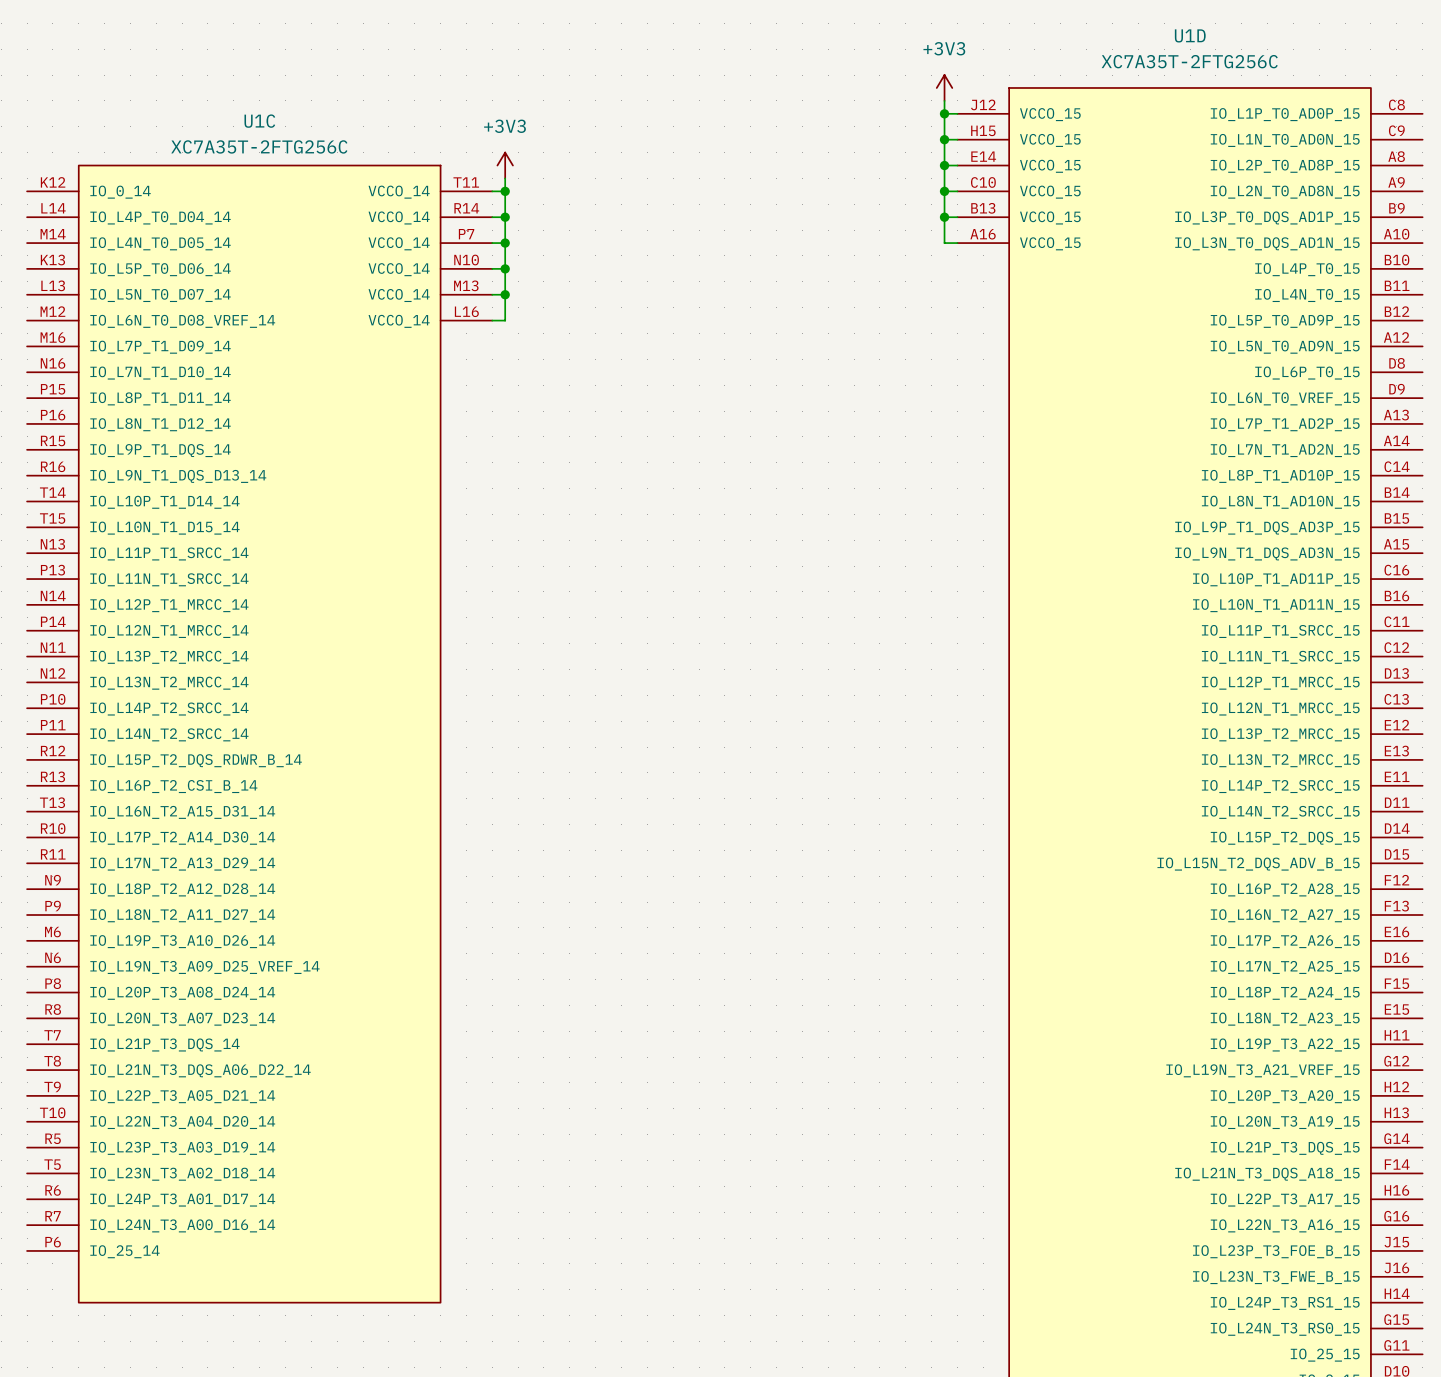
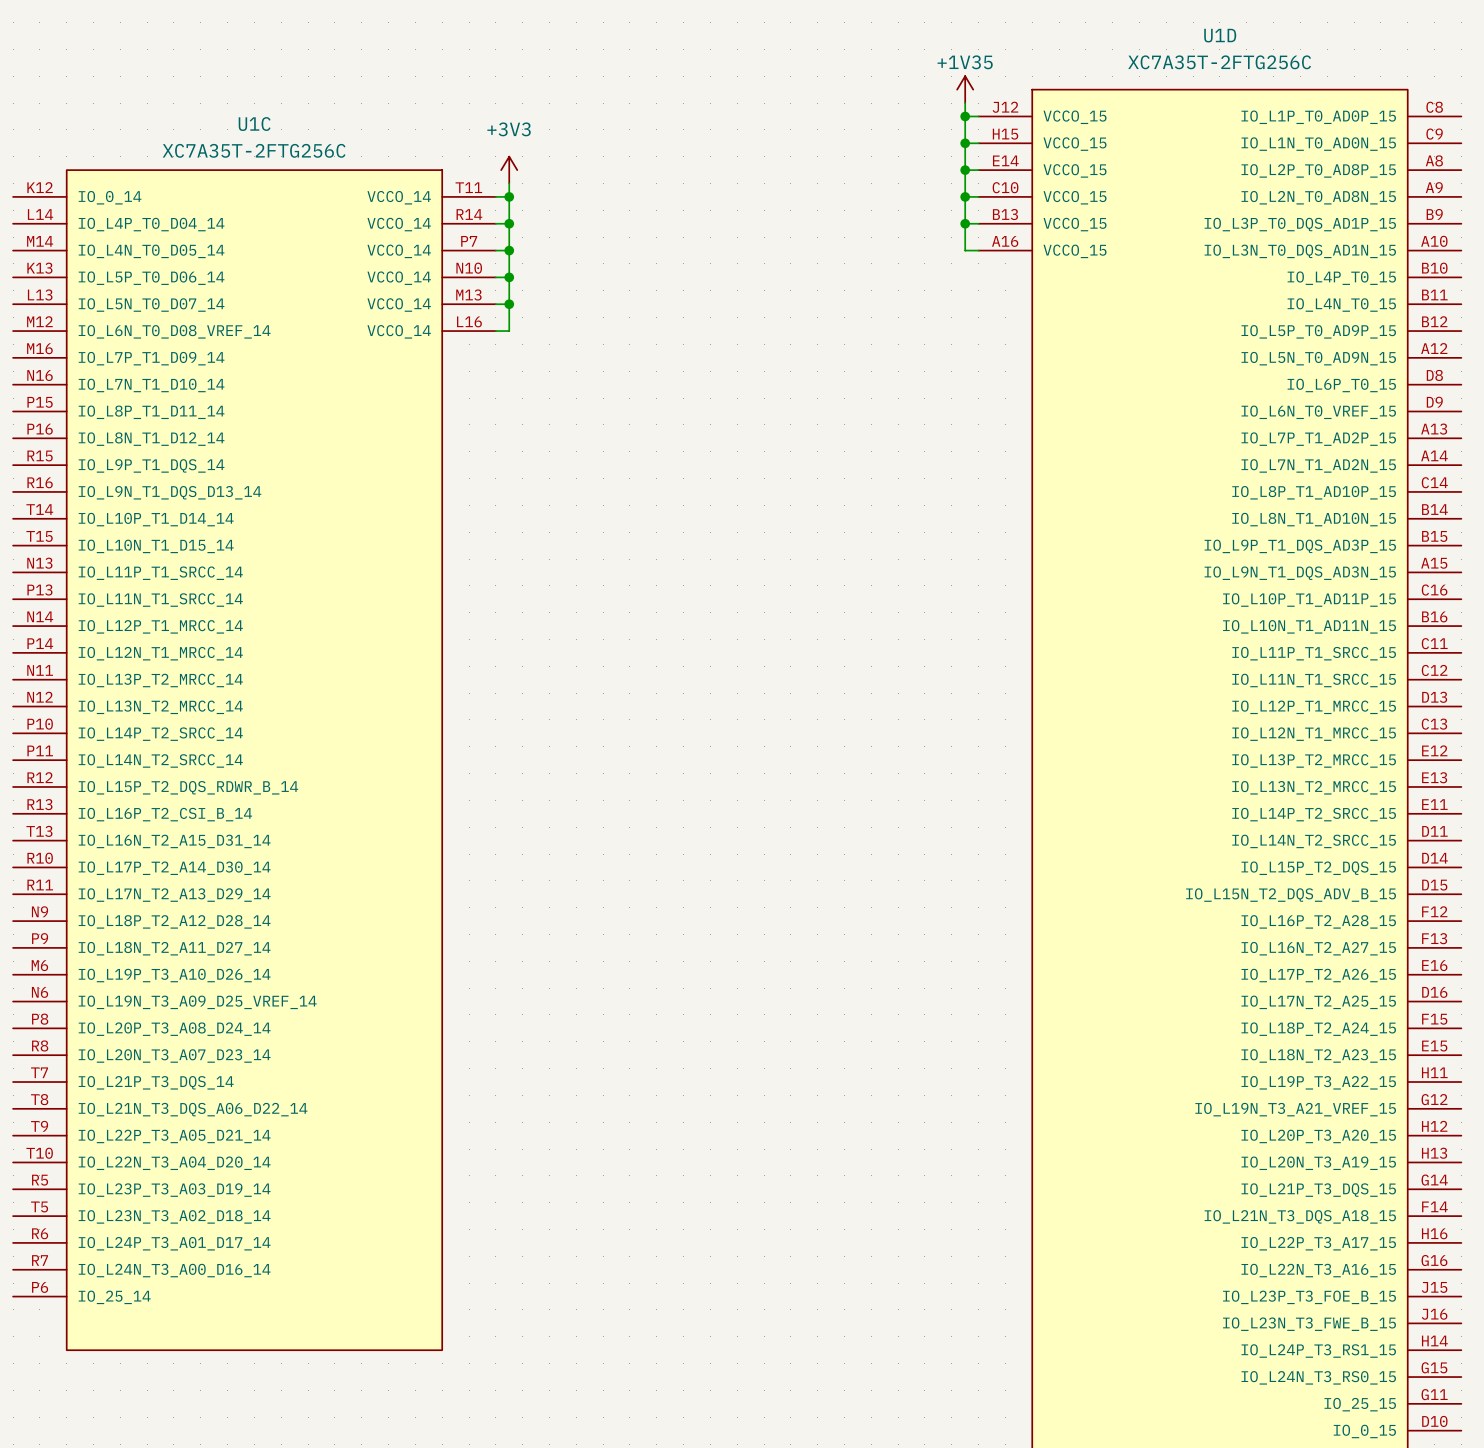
power symbol: +3V3 (944, 87) -> +1V35 (965, 89)

